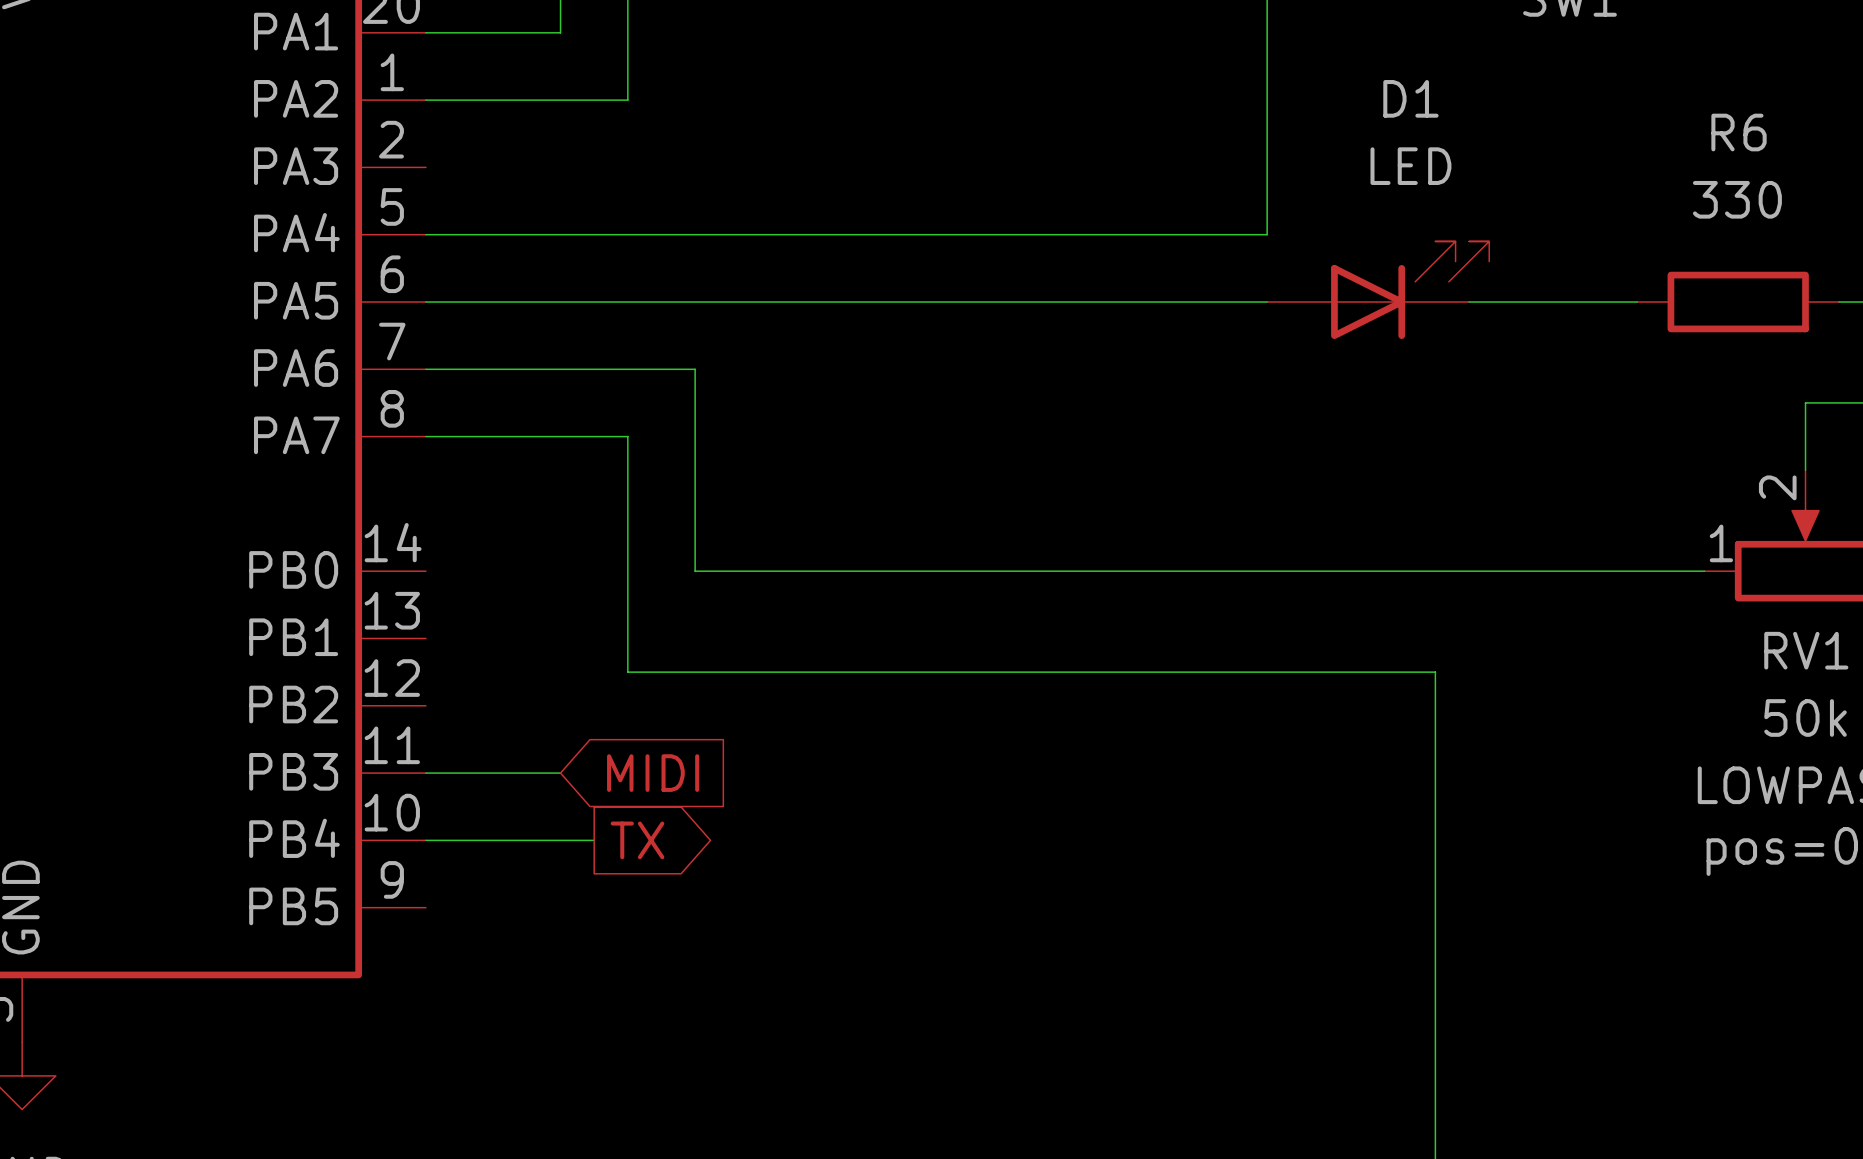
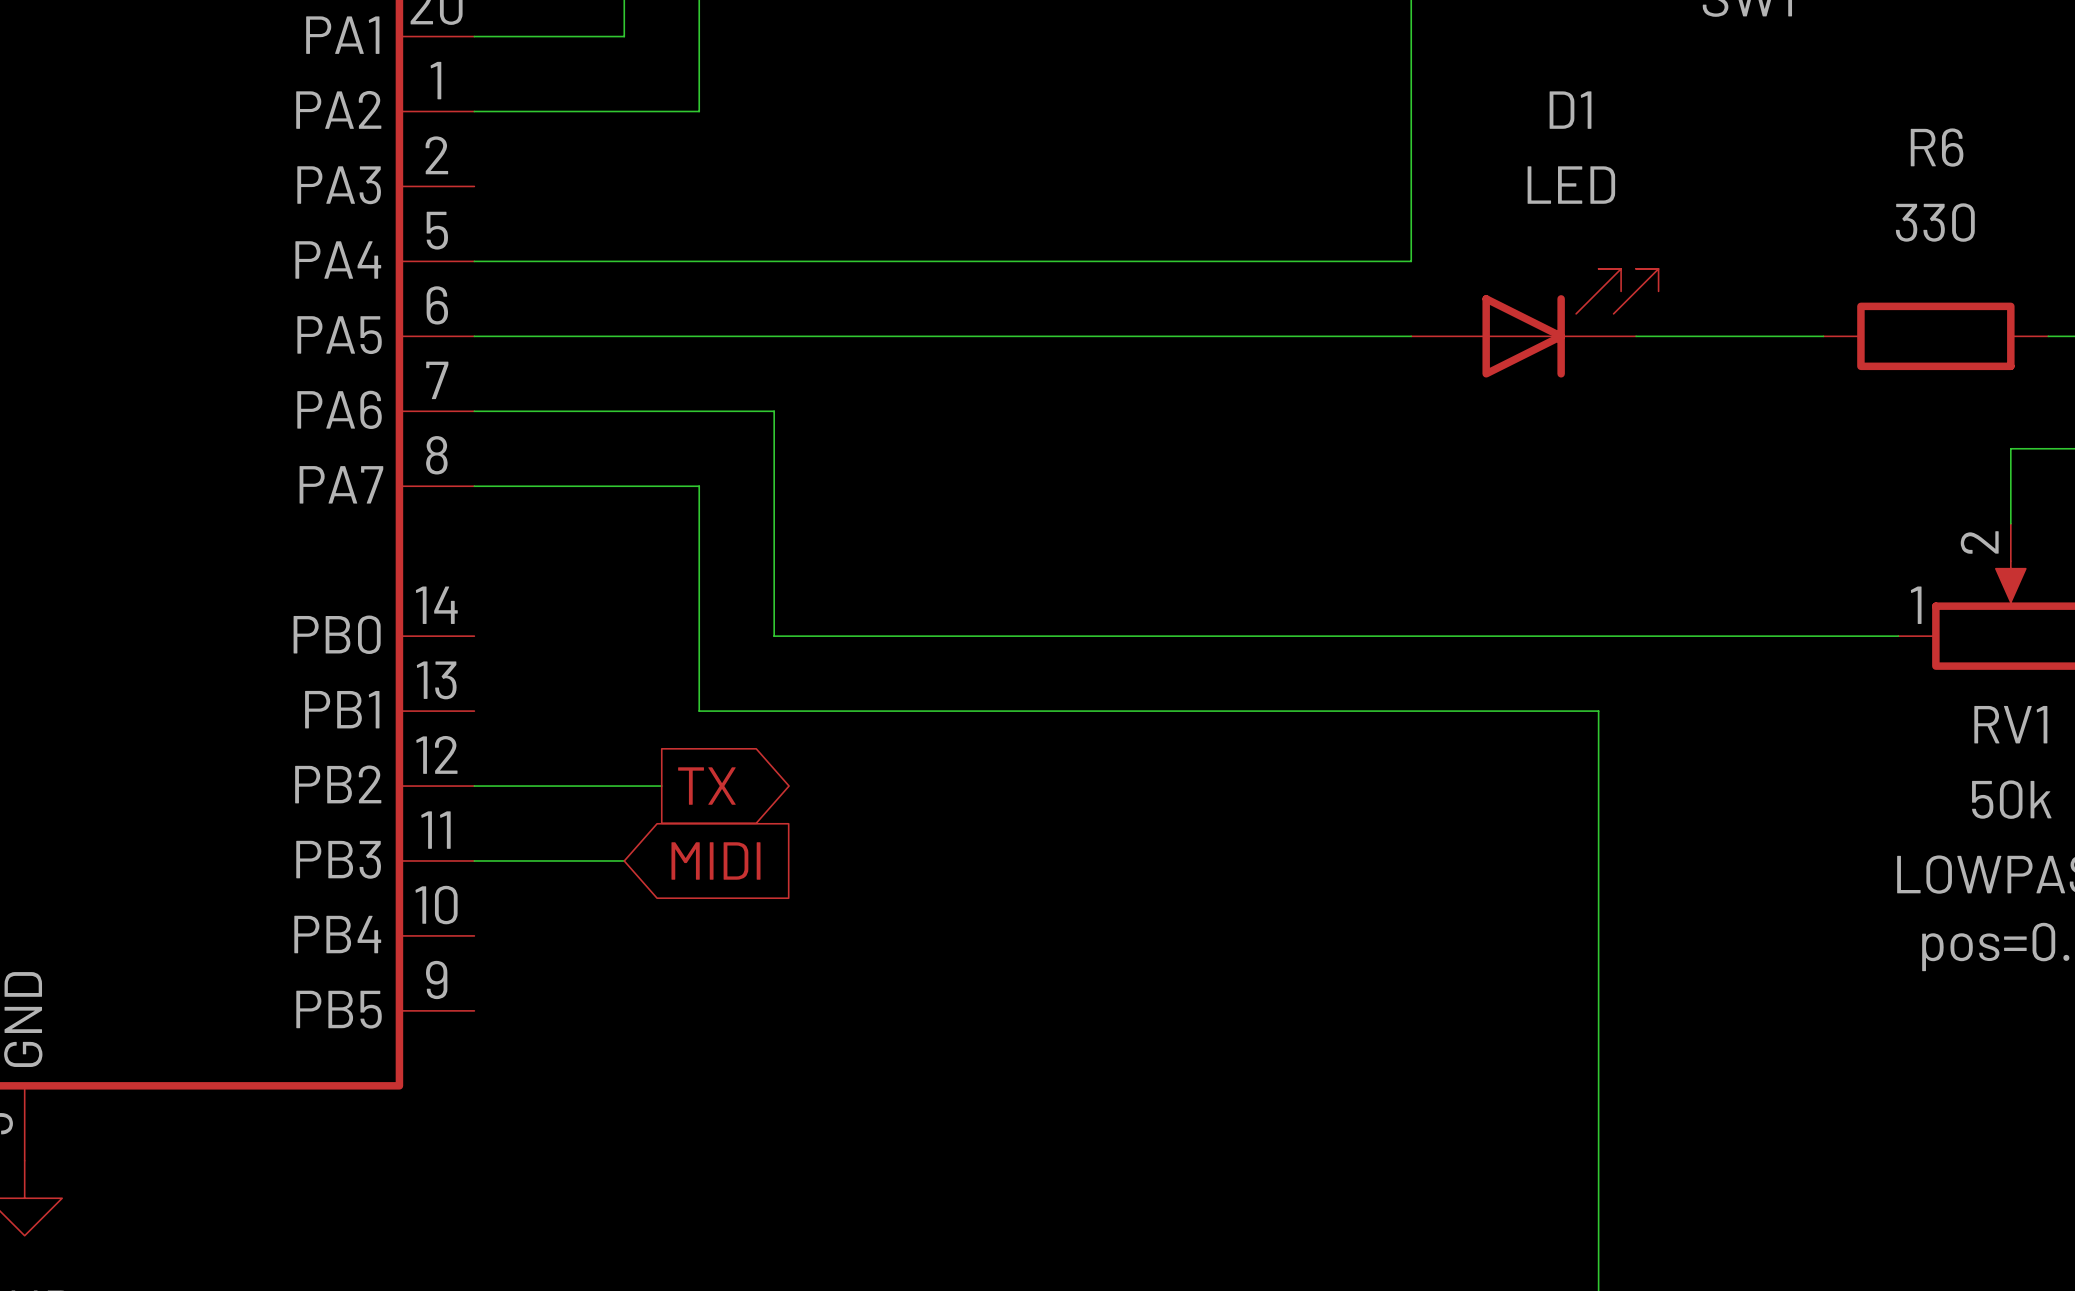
wire: (627, 638) (627, 672) (1435, 672) -> (699, 711) (1598, 711) (1598, 748)
wire: (425, 840) (594, 840) -> (474, 786) (661, 786)
global label position: TX (637, 840) -> TX (706, 786)

